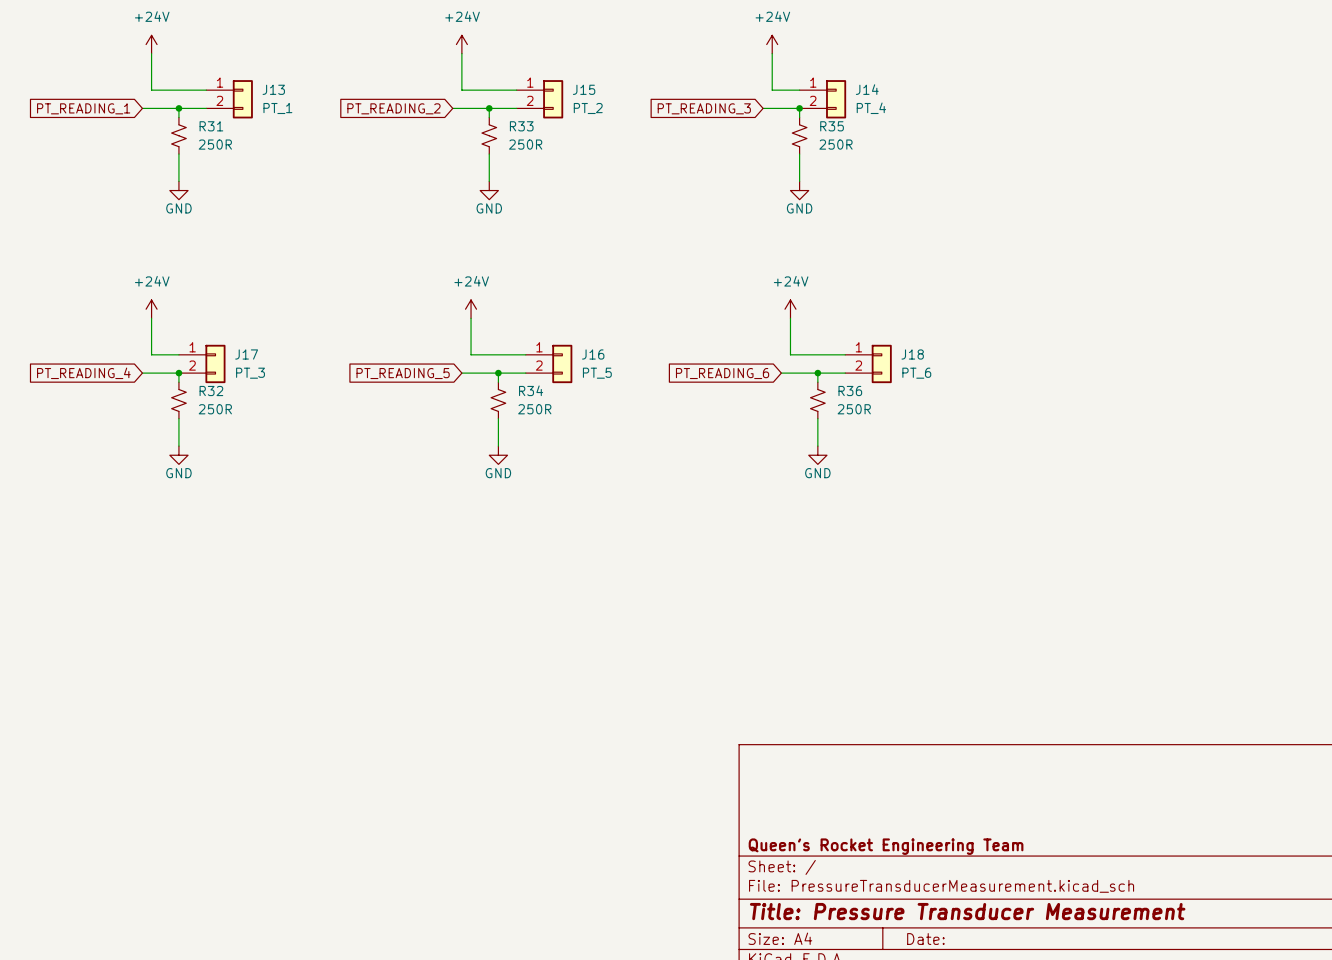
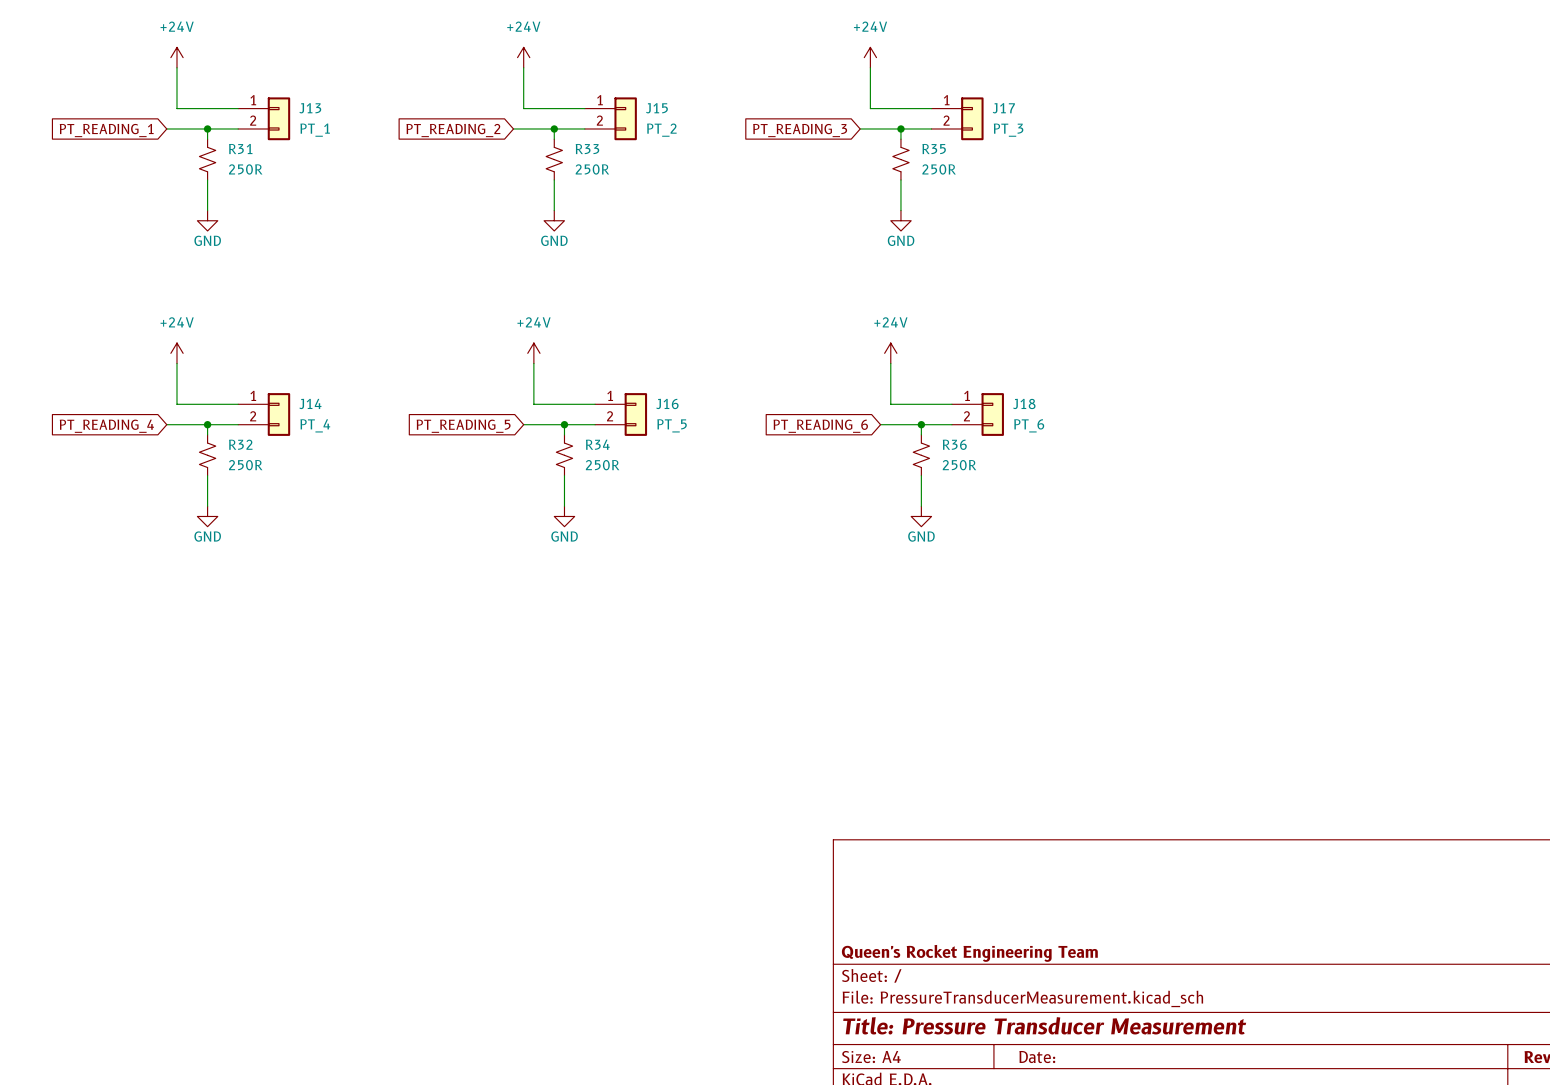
J14 position: (822, 99) -> (264, 414)
J17 position: (202, 363) -> (957, 118)

